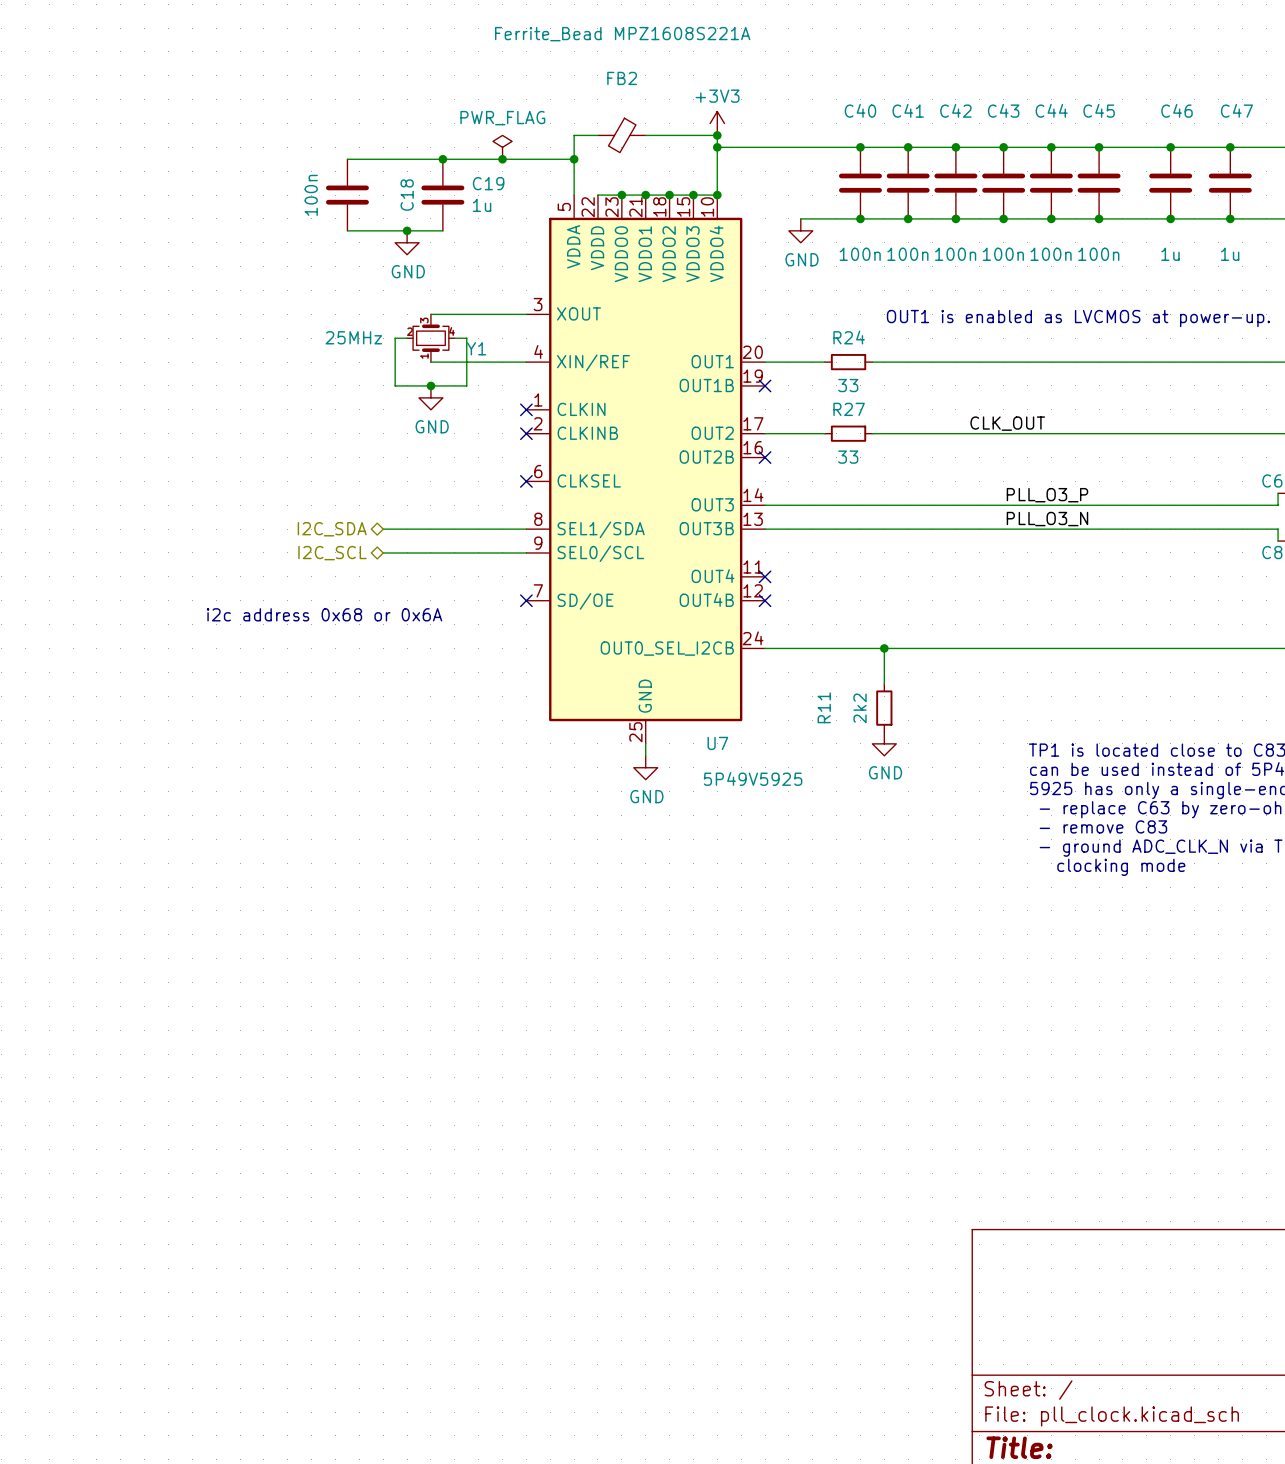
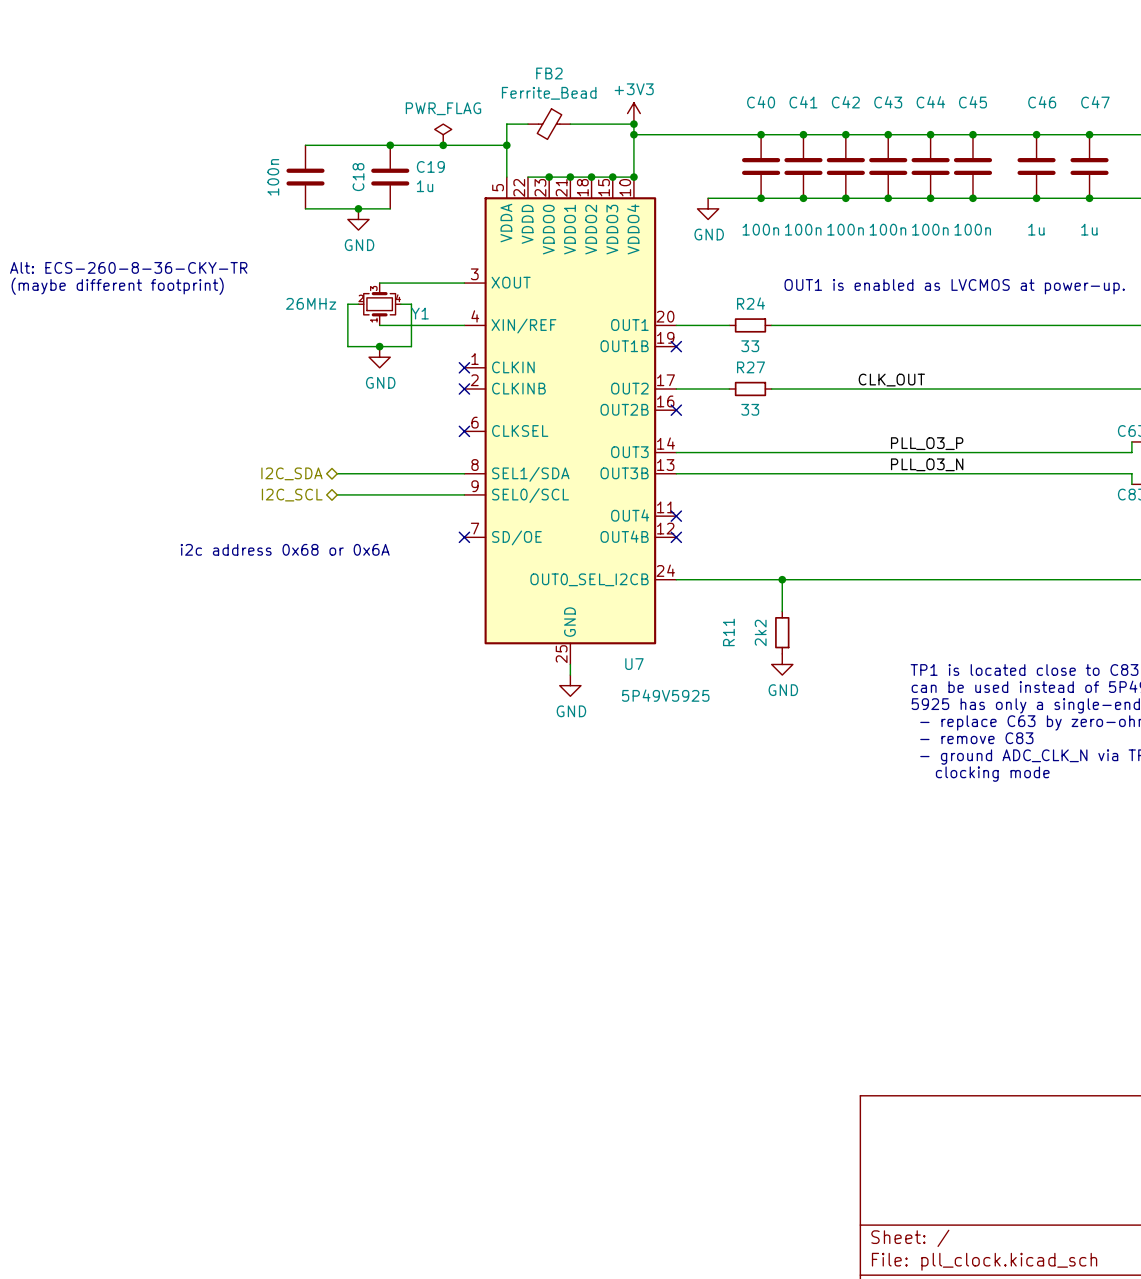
FB2 value: Ferrite_Bead MPZ1608S221A (622, 34) -> Ferrite_Bead (549, 93)
text: none -> Alt: ECS-260-8-36-CKY-TR (128, 267)
text: none -> (maybe different footprint) (117, 286)
Y1 value: 25MHz (353, 337) -> 26MHz (311, 303)

